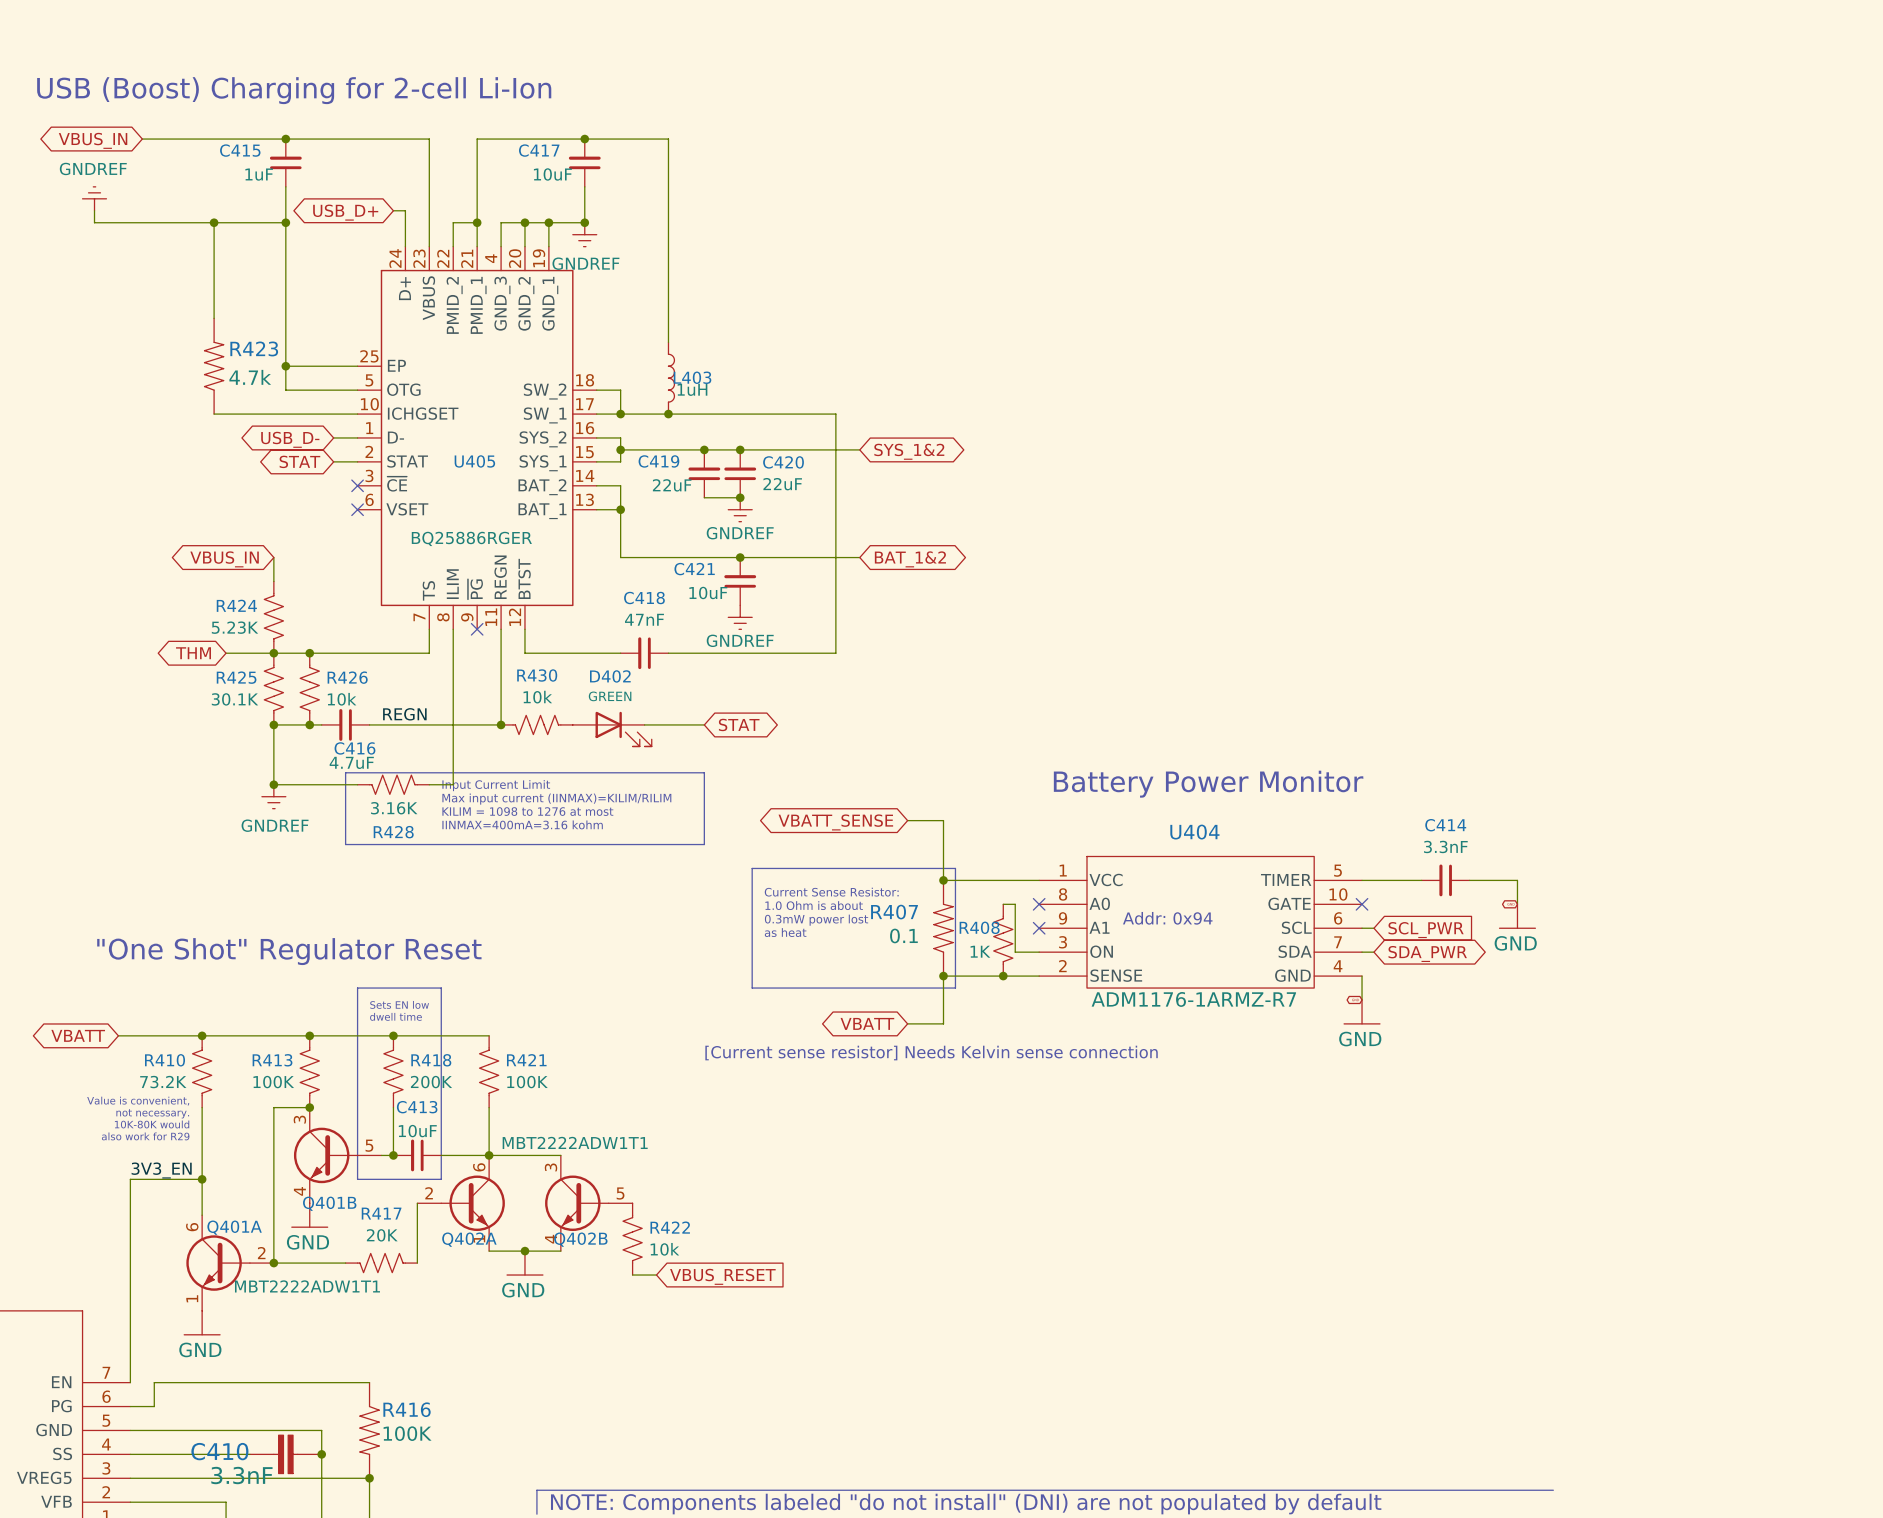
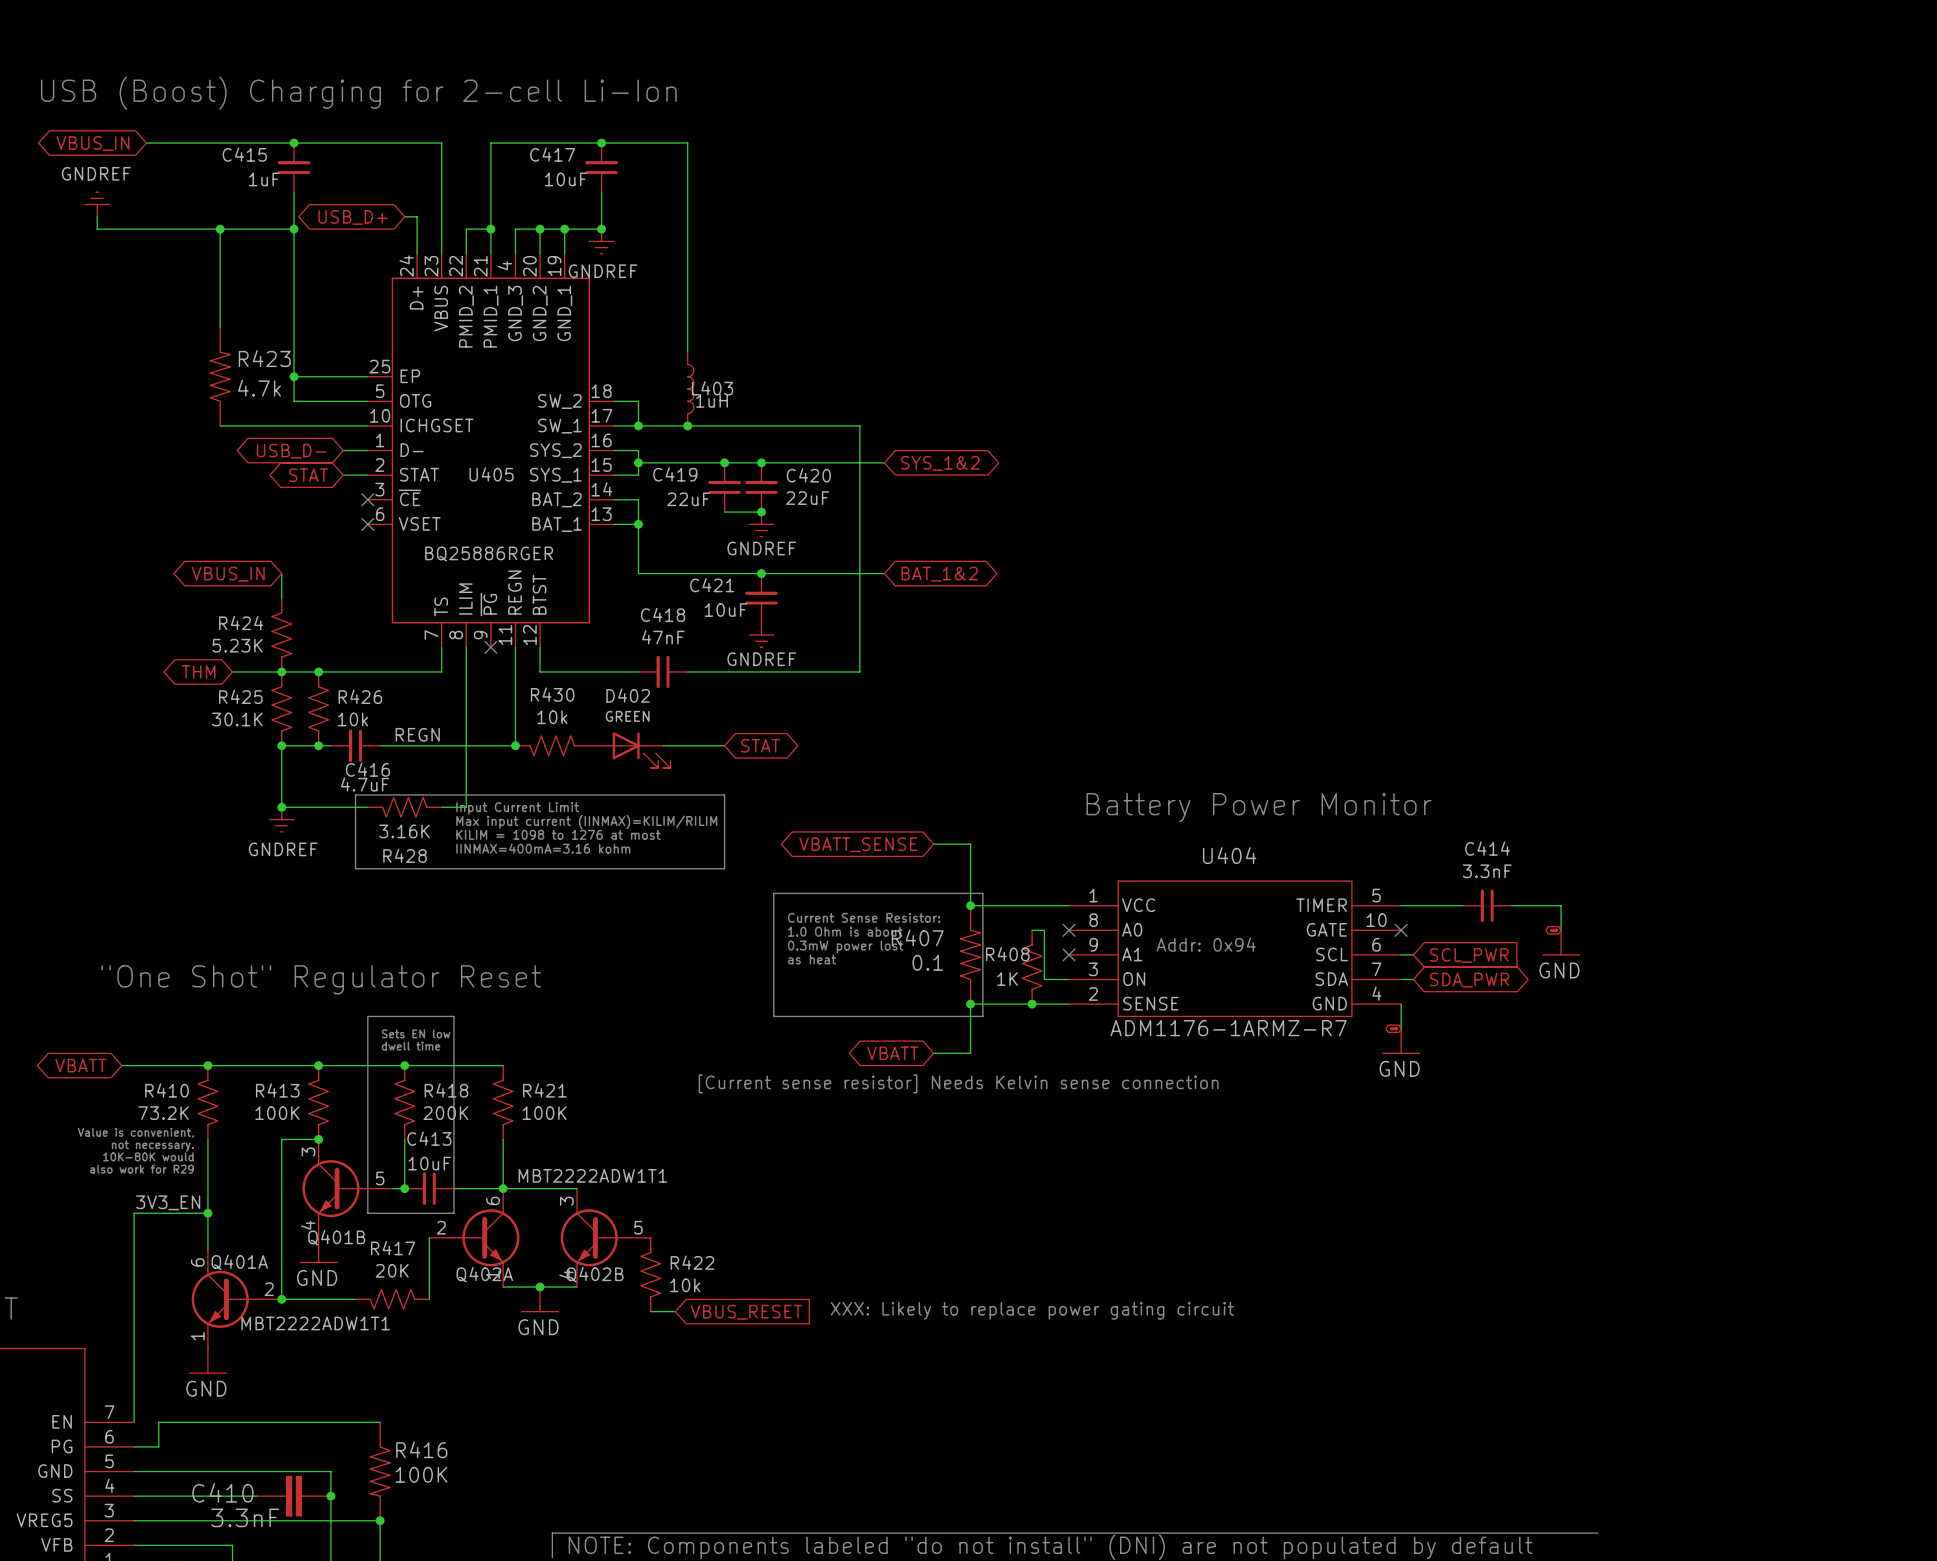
text: none -> XXX: Likely to replace power gating circuit (1032, 1310)

